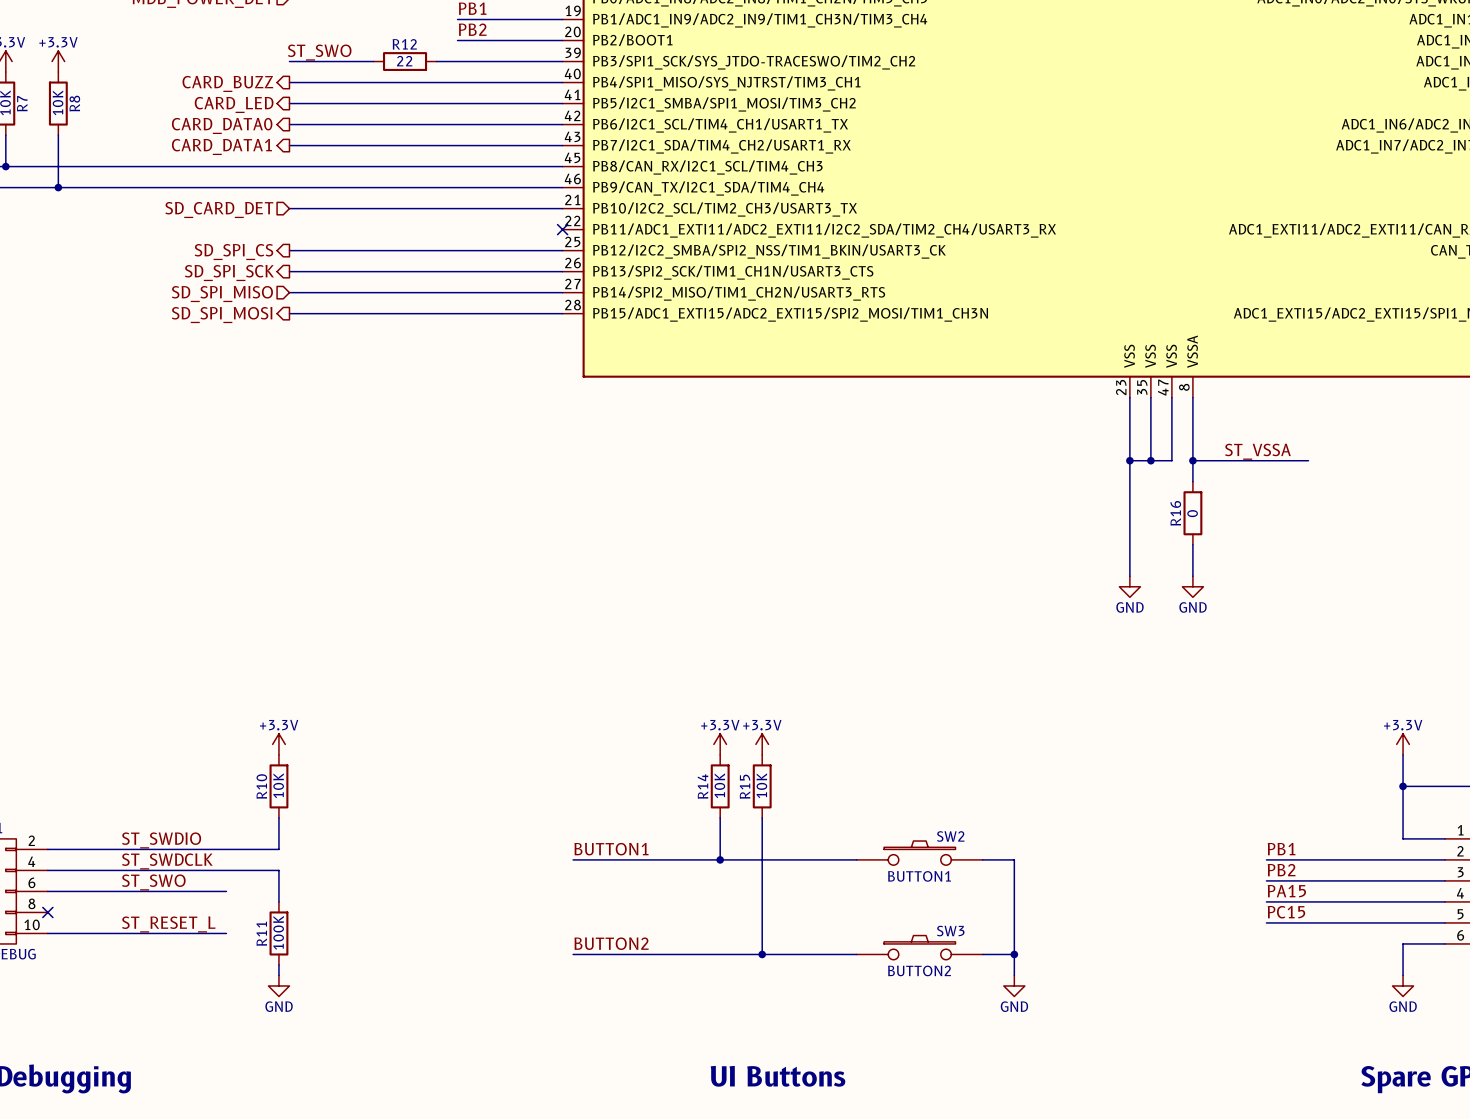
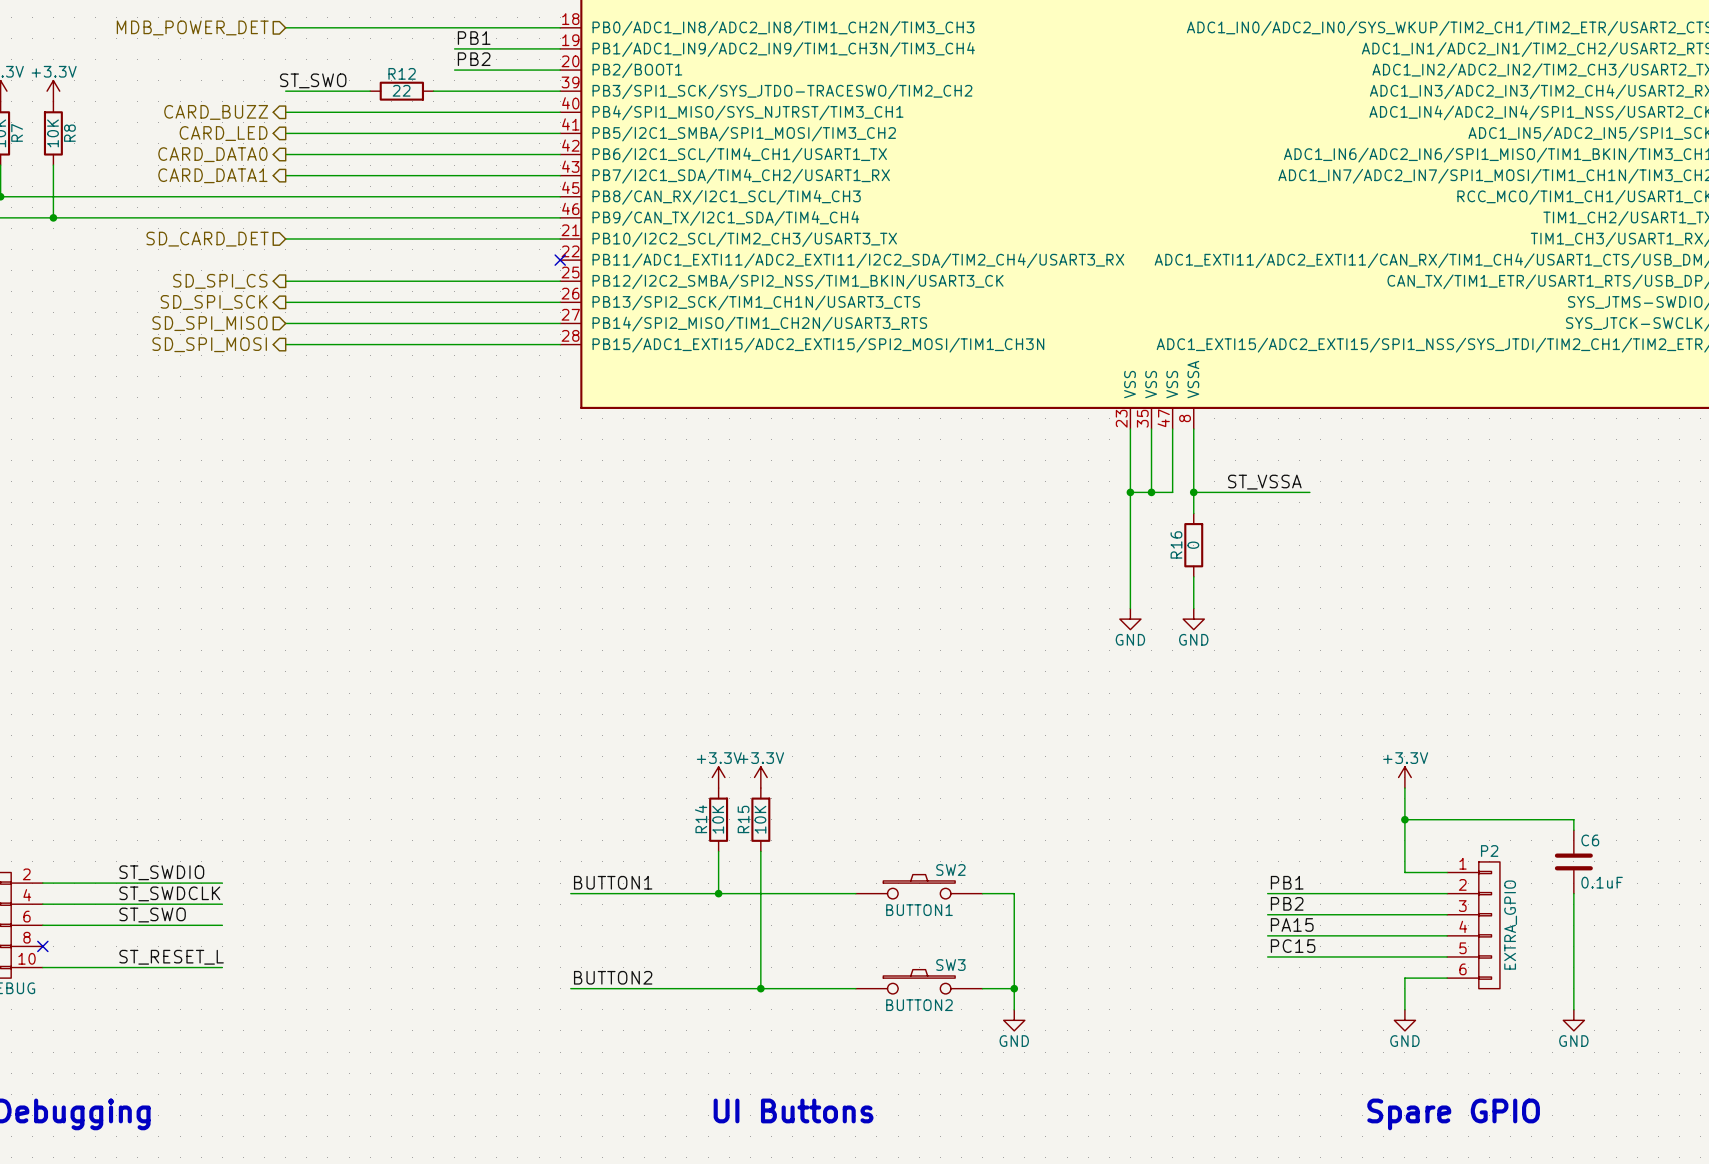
power symbol: +3.3V (278, 744) -> none
R10: 10K (278, 786) -> none
wire: (278, 817) (278, 849) (226, 849) -> none
wire: (226, 870) (278, 870) (278, 901) -> none
R11: 100K (278, 933) -> none
wire: (278, 964) (278, 975) -> none
power symbol: GND (278, 985) -> none

